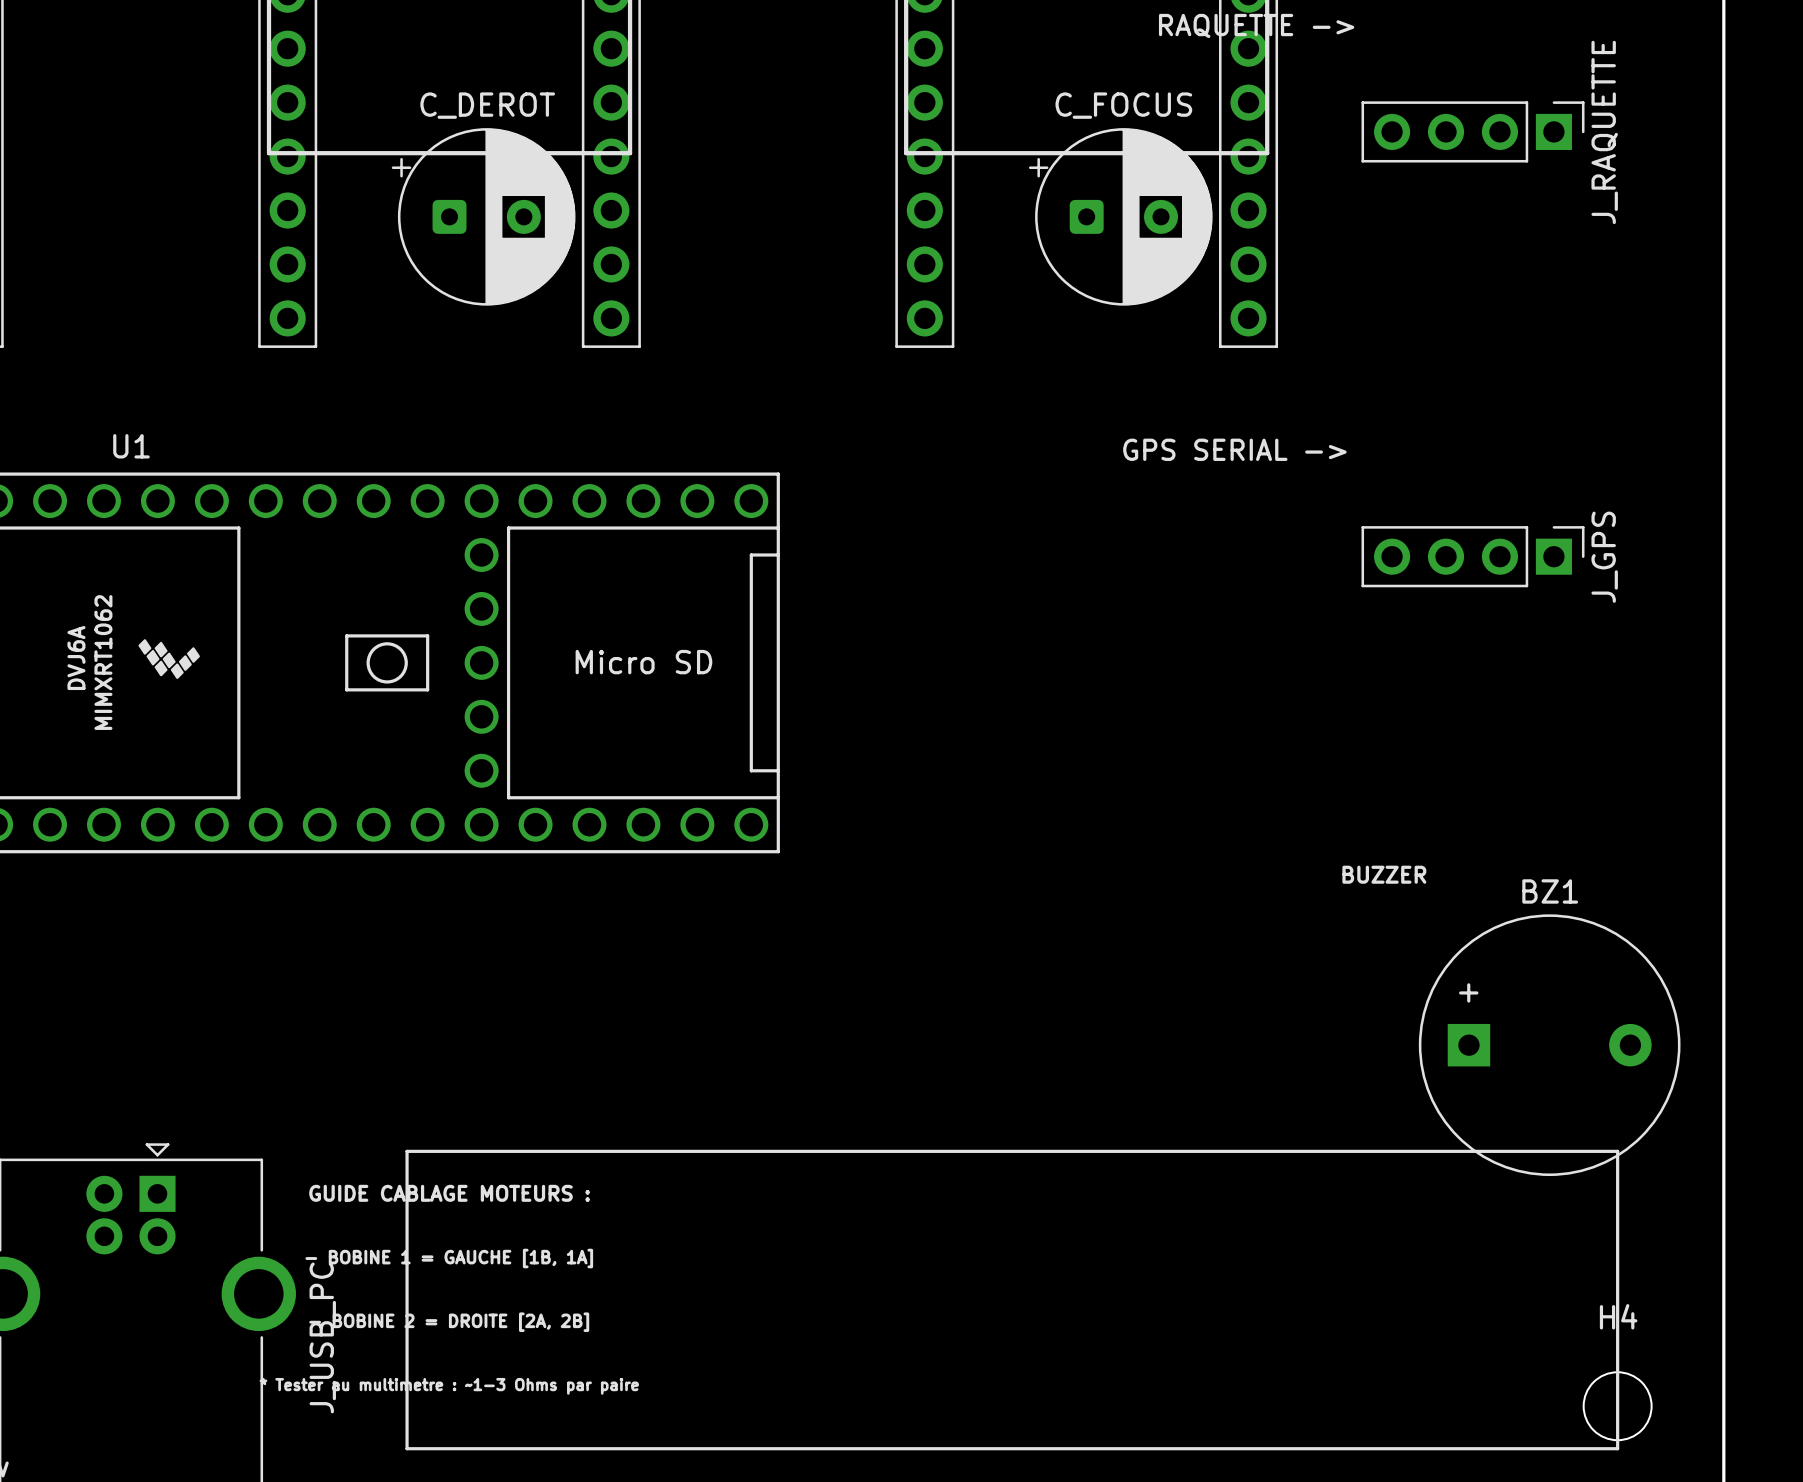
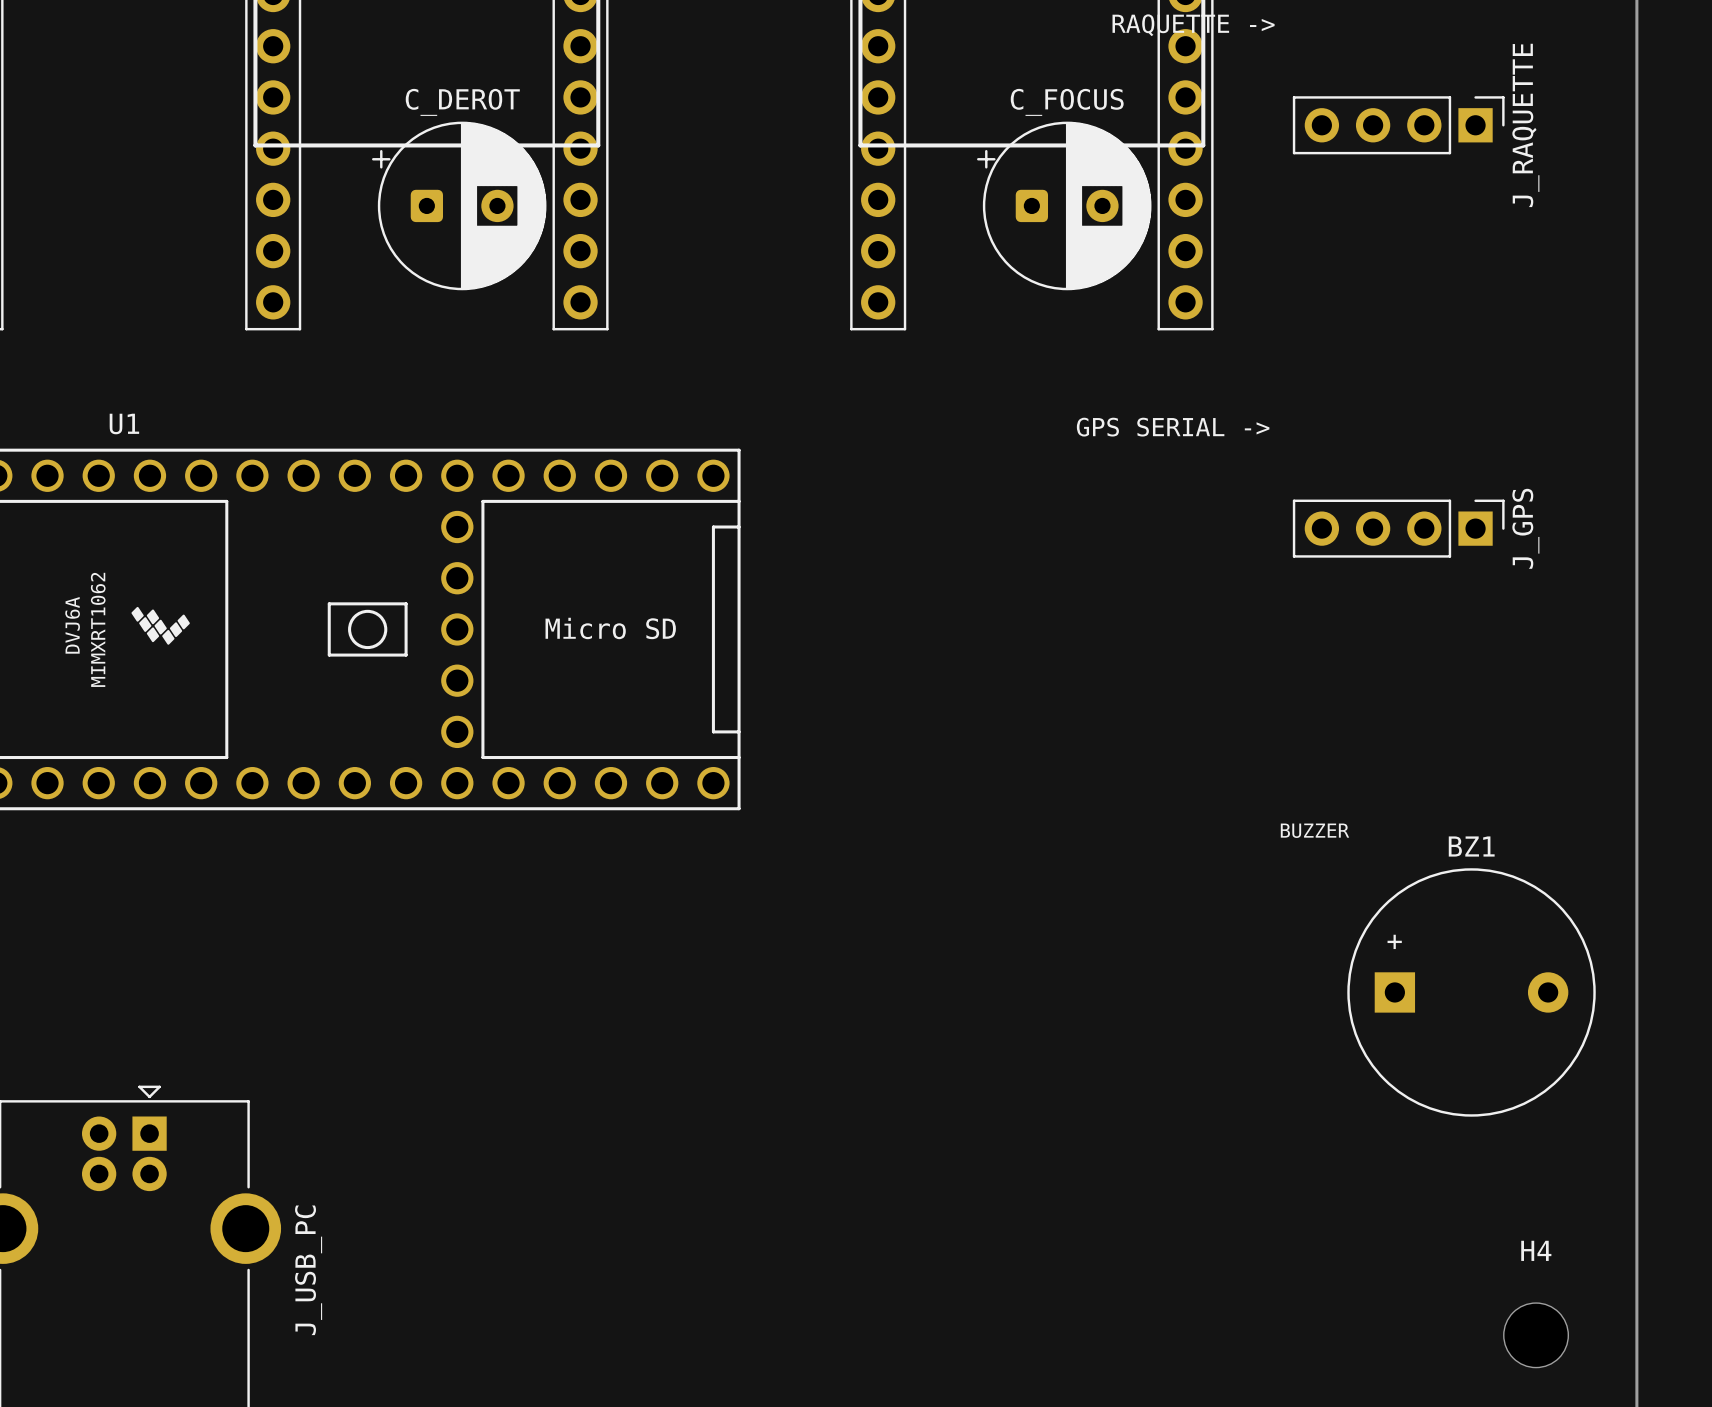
line: (407, 1151) (1617, 1151) (1617, 1448) (407, 1448) (407, 1151) -> none
text: GUIDE CABLAGE MOTEURS : (449, 1193) -> none
text: - BOBINE 1 = GAUCHE [1B, 1A] (449, 1258) -> none
text: - BOBINE 2 = DROITE [2A, 2B] (449, 1322) -> none
text: * Tester au multimetre : ~1-3 Ohms par paire (449, 1386) -> none

